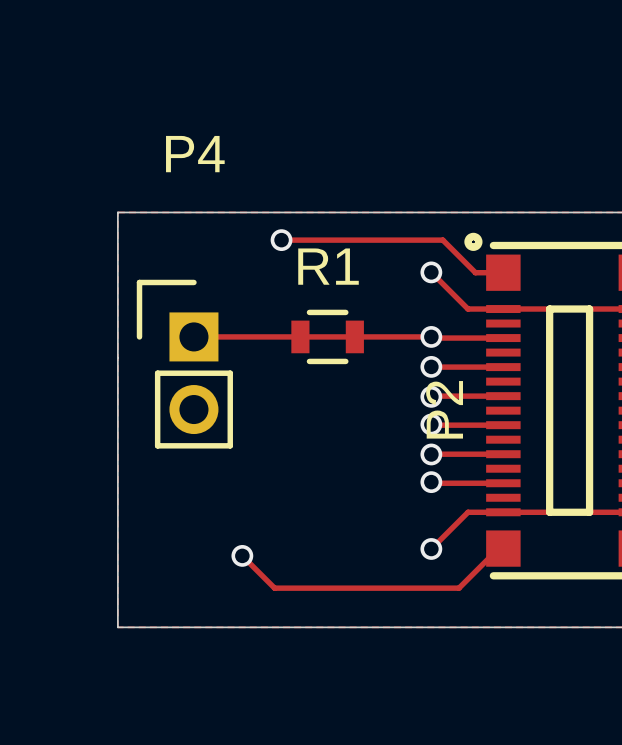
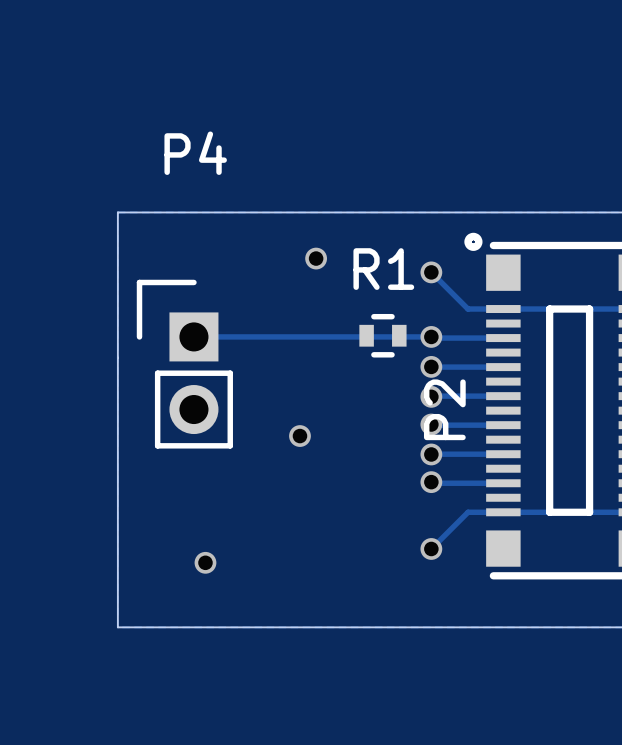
track: (281, 240) (442, 240) (475, 272) (503, 272) -> none
via position: (281, 240) -> (316, 258)
R1 footprint: [291, 309, 364, 365] -> [359, 313, 407, 358]
via: none -> (299, 436)
track: (503, 548) (498, 548) (459, 588) (274, 588) (242, 555) -> none
via position: (242, 555) -> (205, 562)

